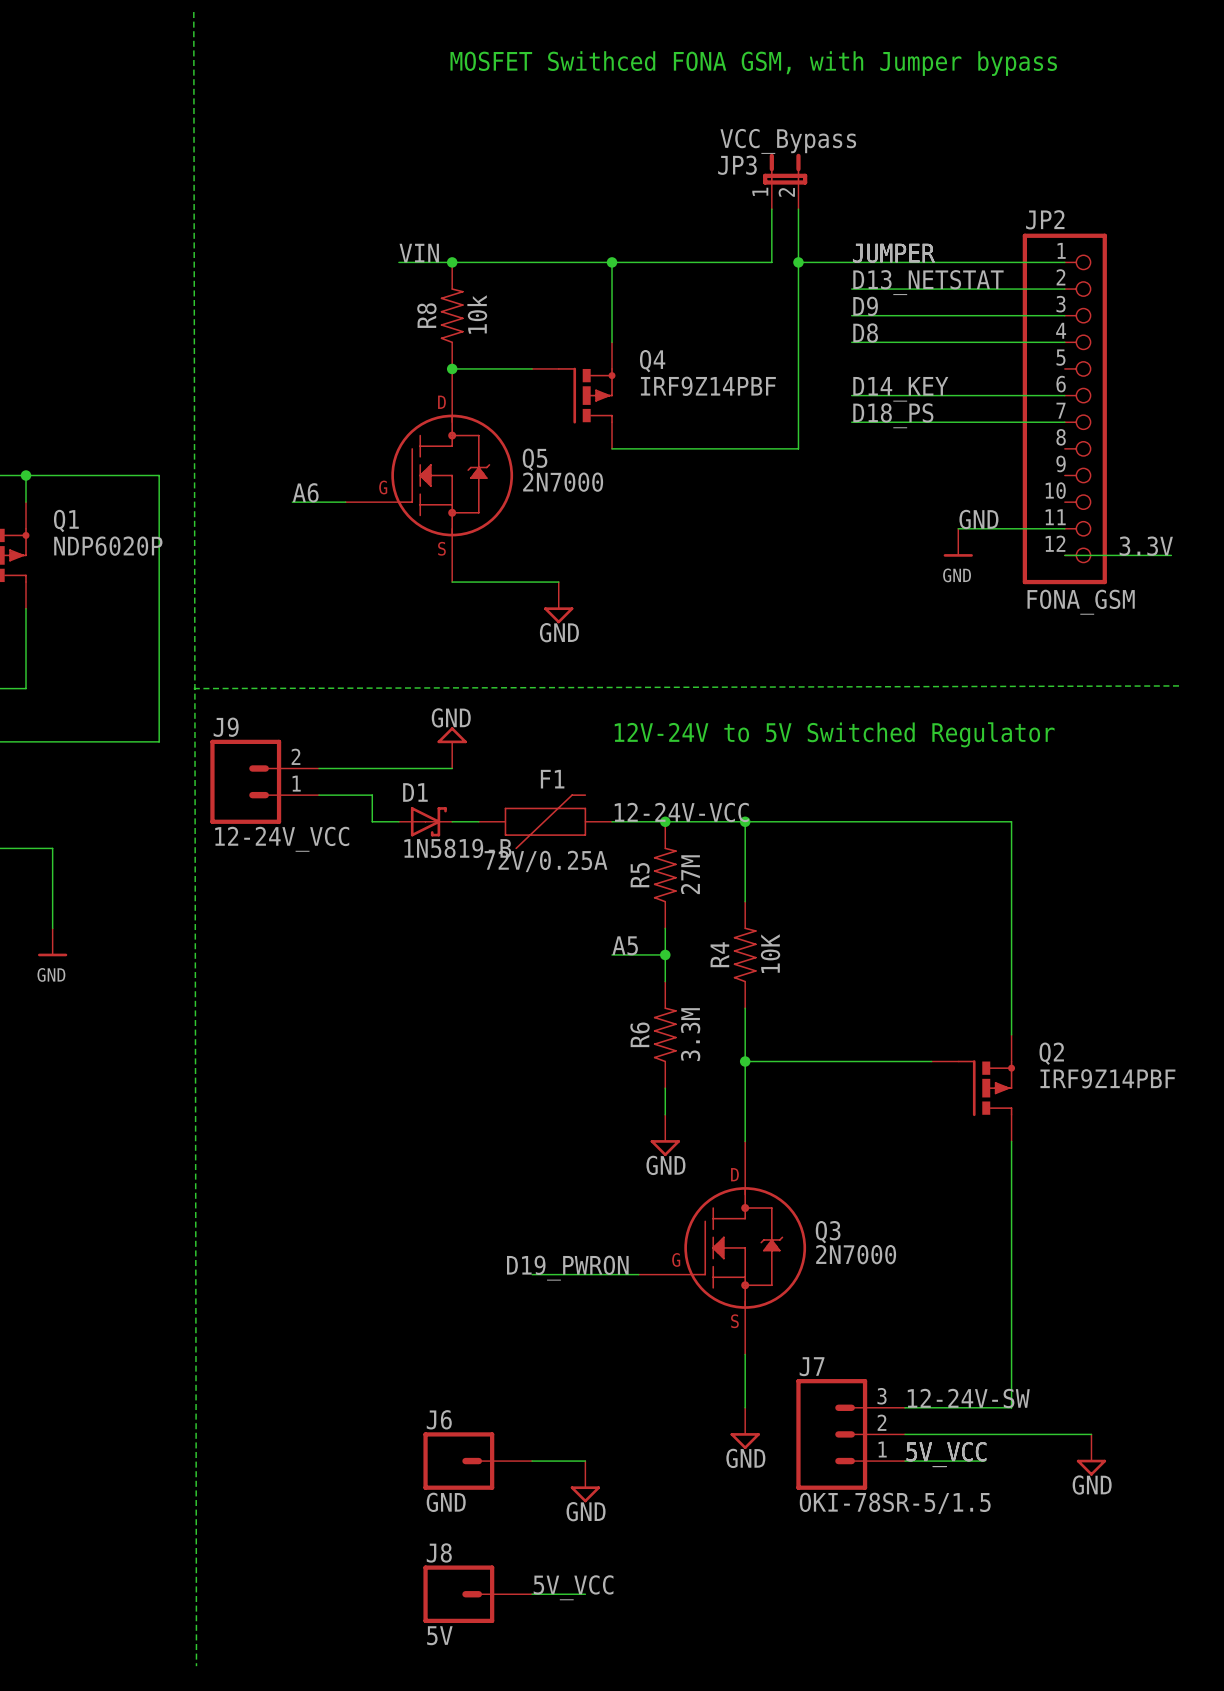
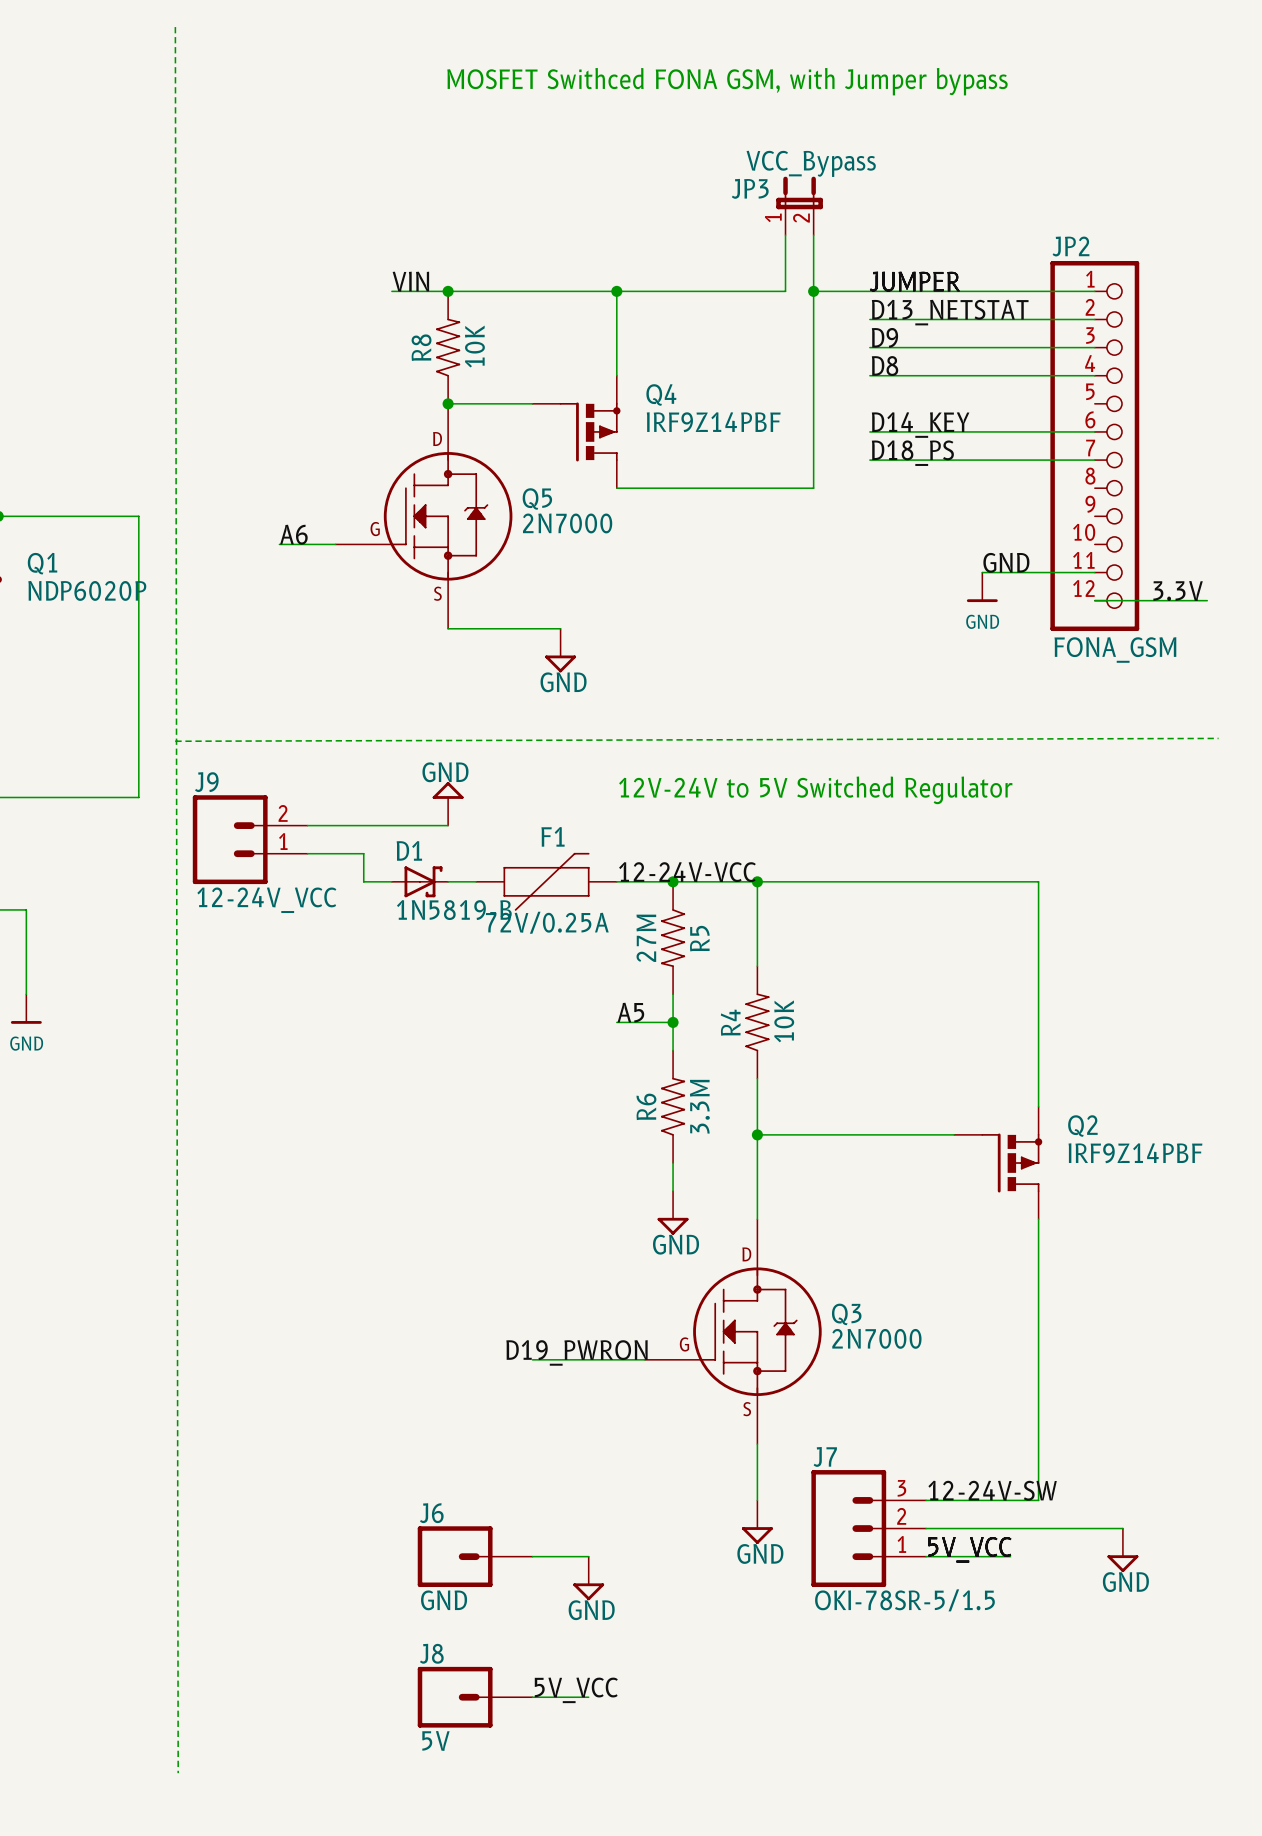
R8 value: 10k (477, 314) -> 10K (474, 346)
R5 rotation: 0° (665, 875) -> 180° (673, 938)

